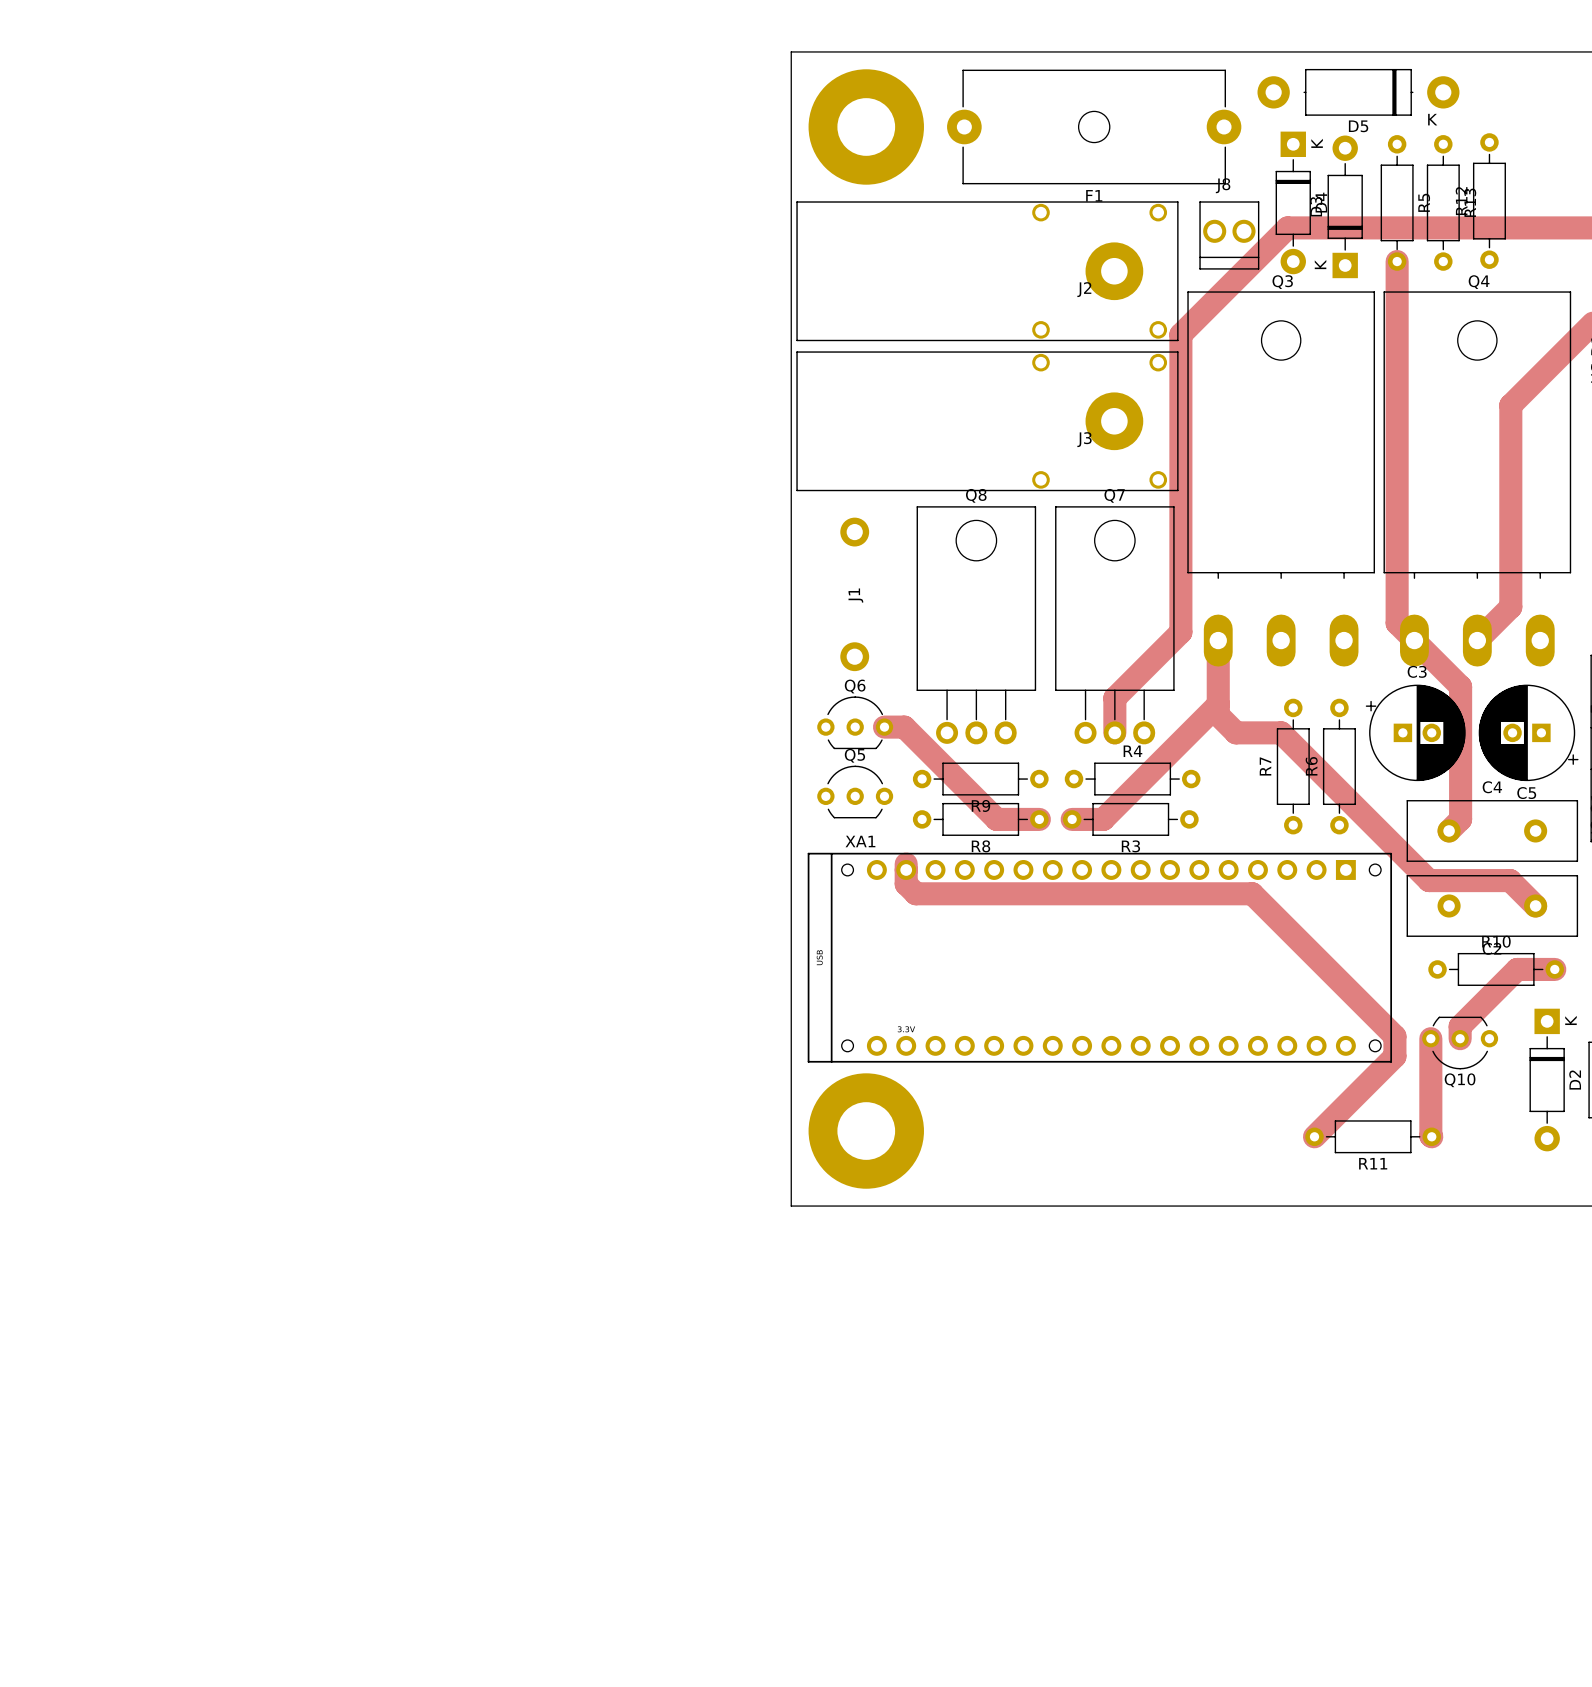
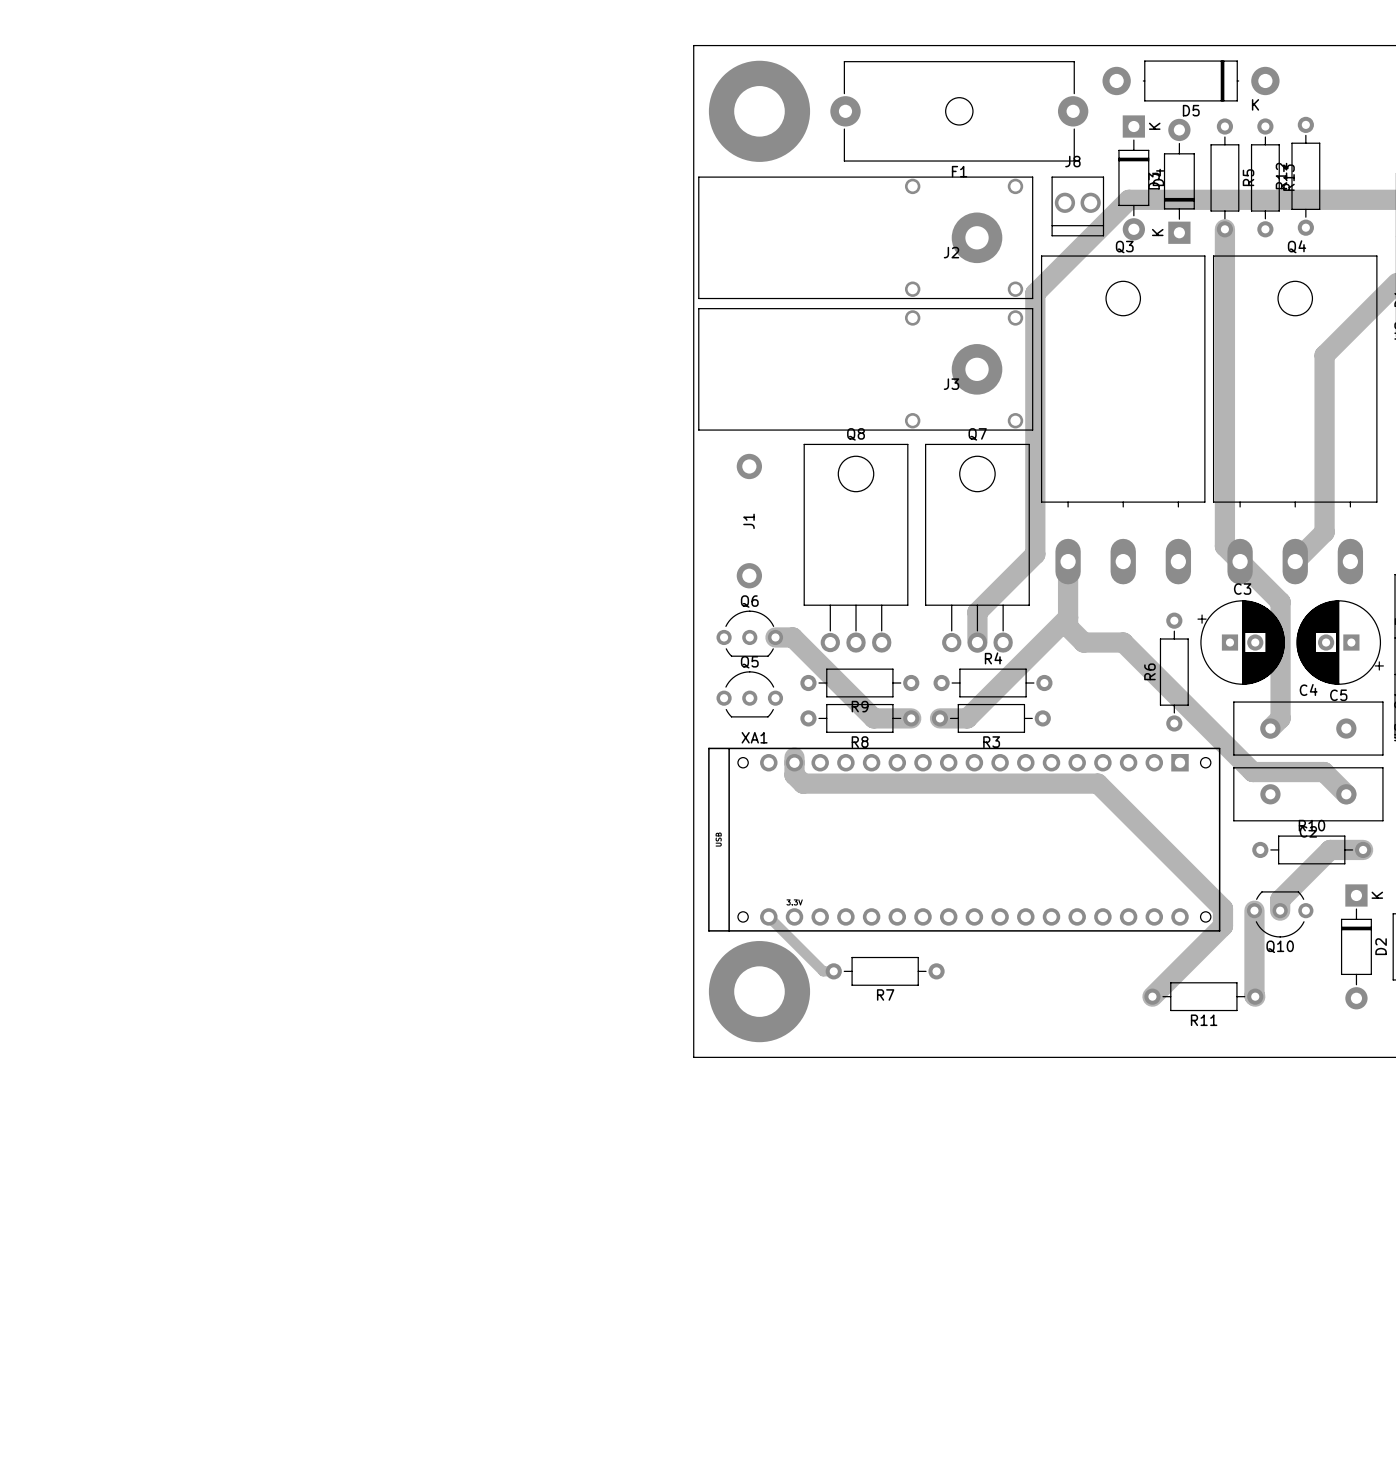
R7 name position: R7 (1265, 766) -> R7 (885, 994)
R7 rotation: 0° (1293, 766) -> 90° clockwise (885, 971)
R7 position: (1293, 766) -> (885, 971)
track: none -> (768, 916) (823, 971) (833, 971)

